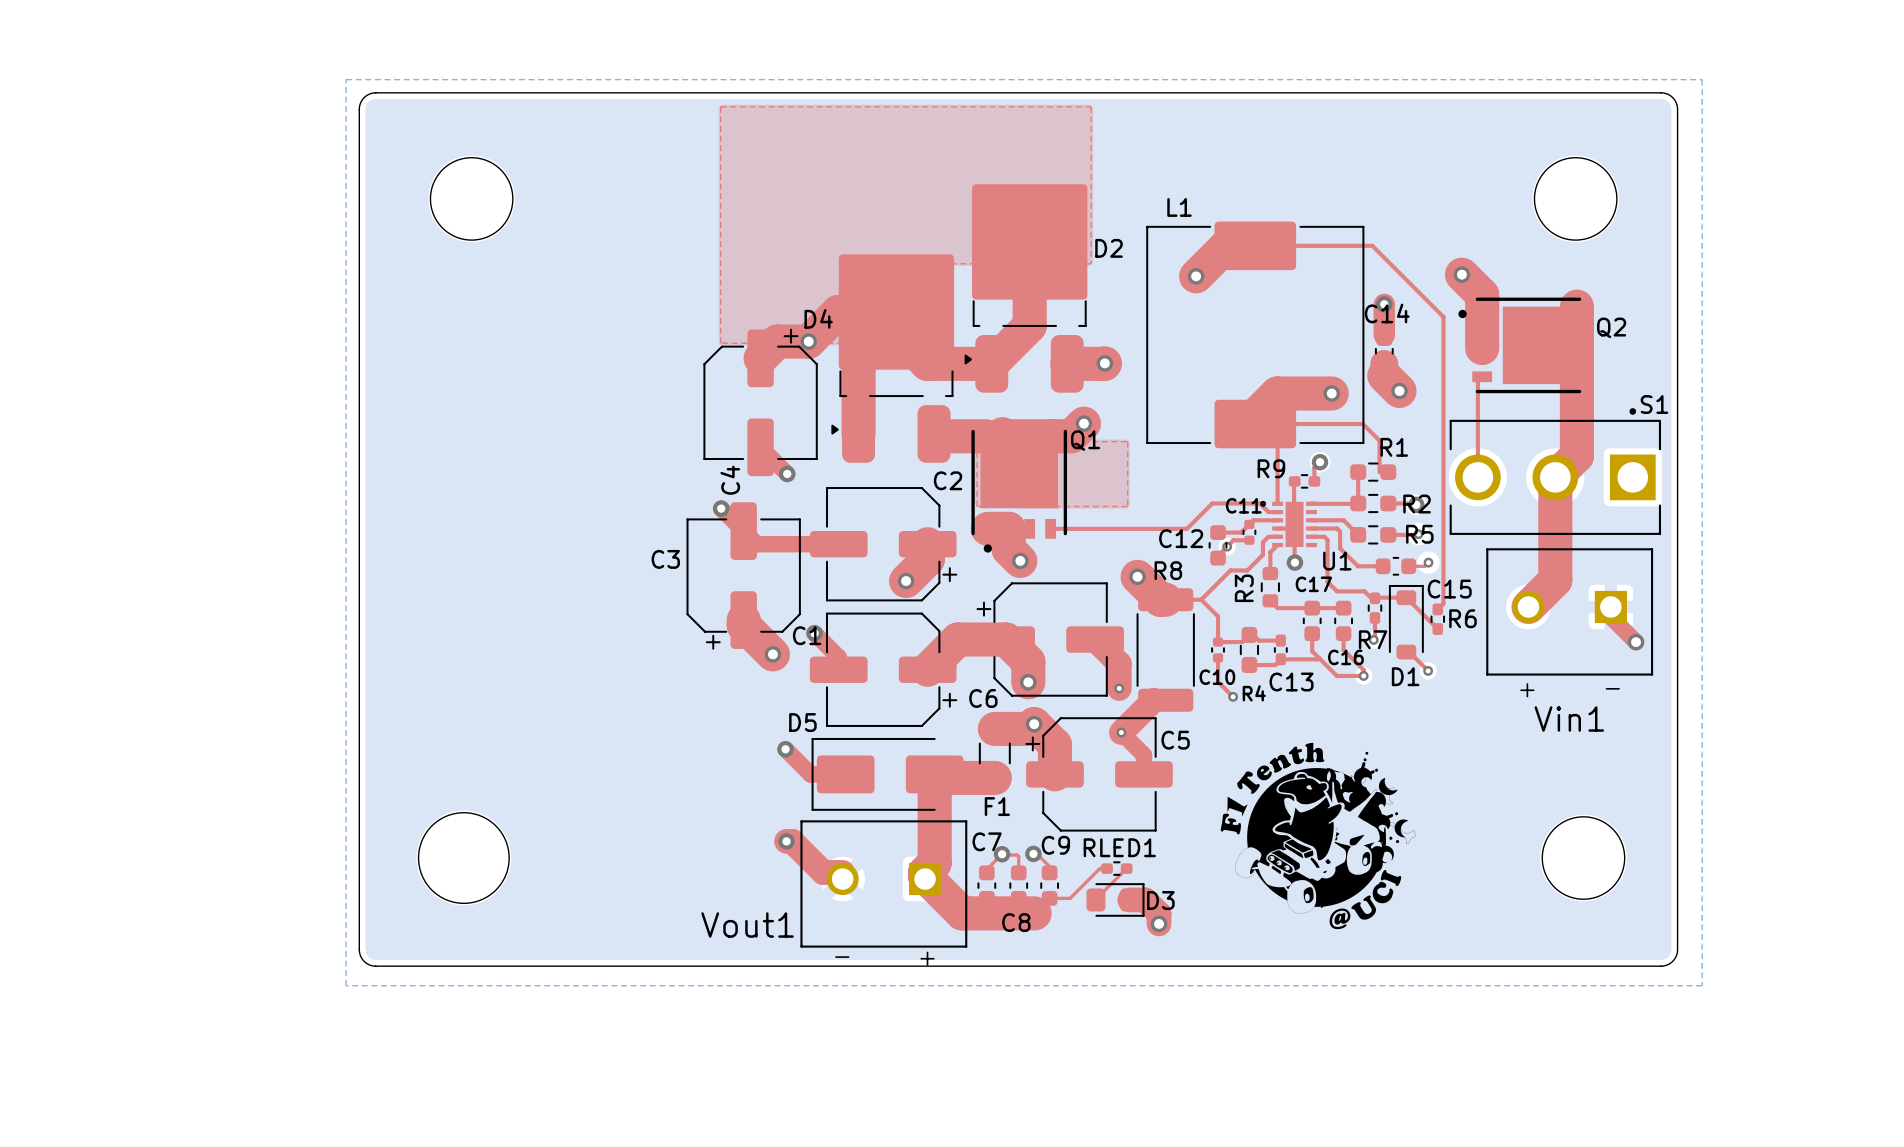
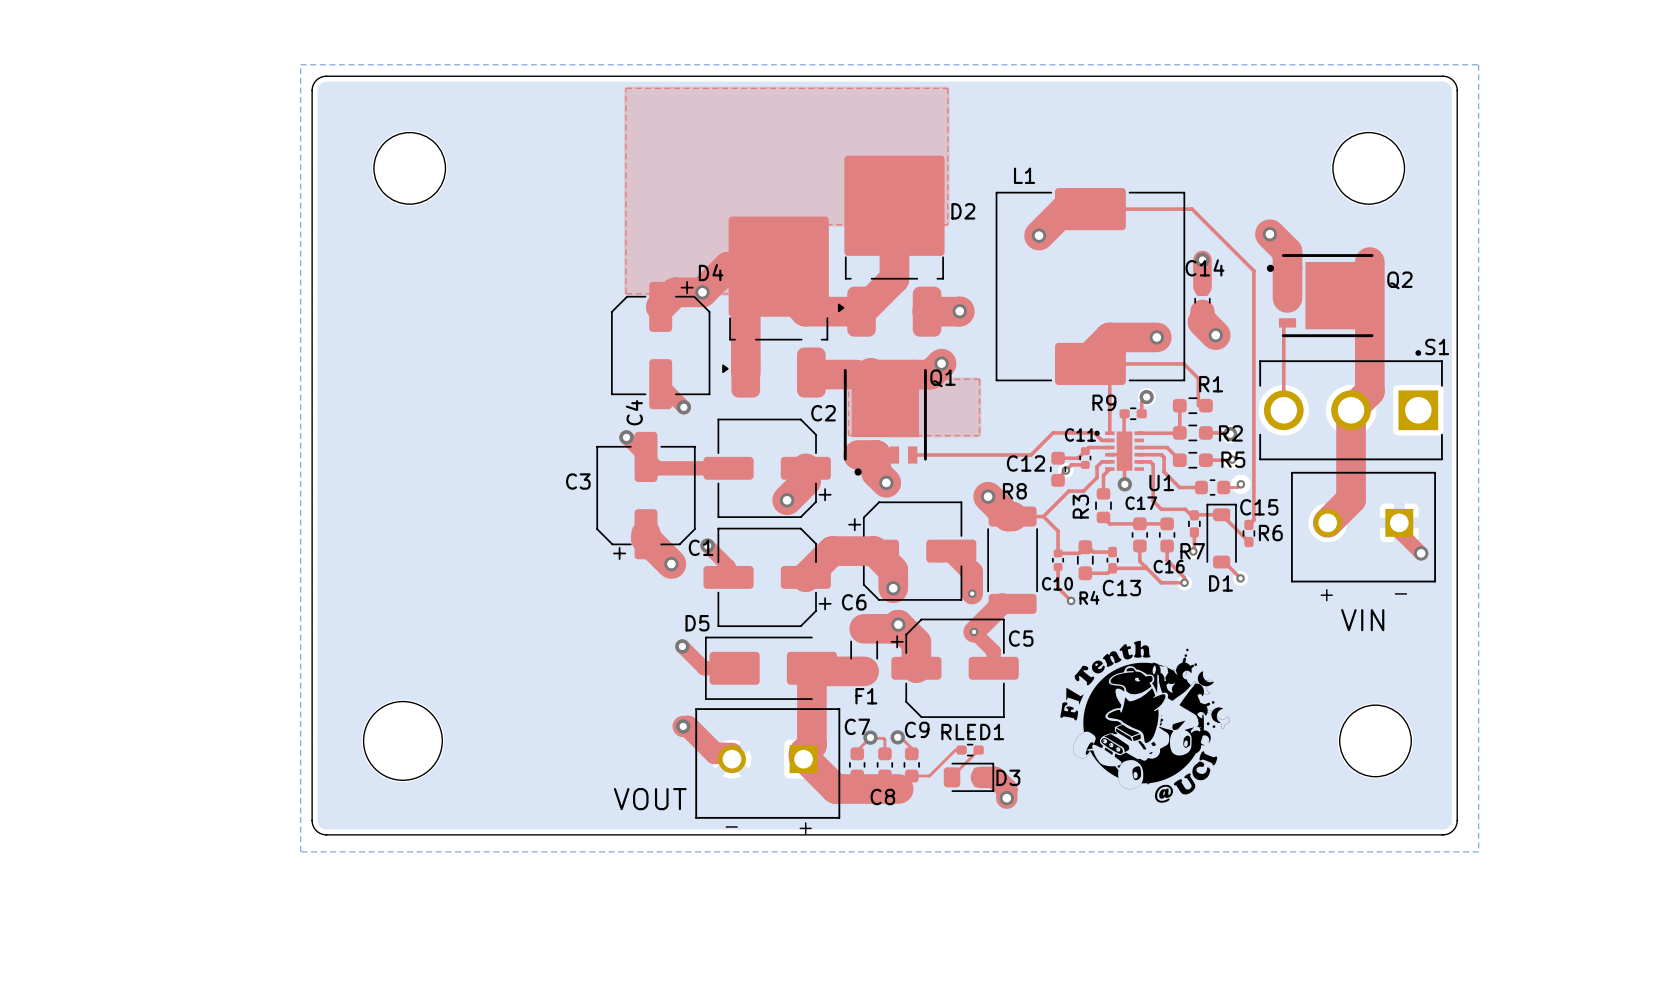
Vin1 name: Vin1 (1569, 718) -> VIN (1362, 620)
Vout1 name: Vout1 (747, 925) -> VOUT (650, 799)

